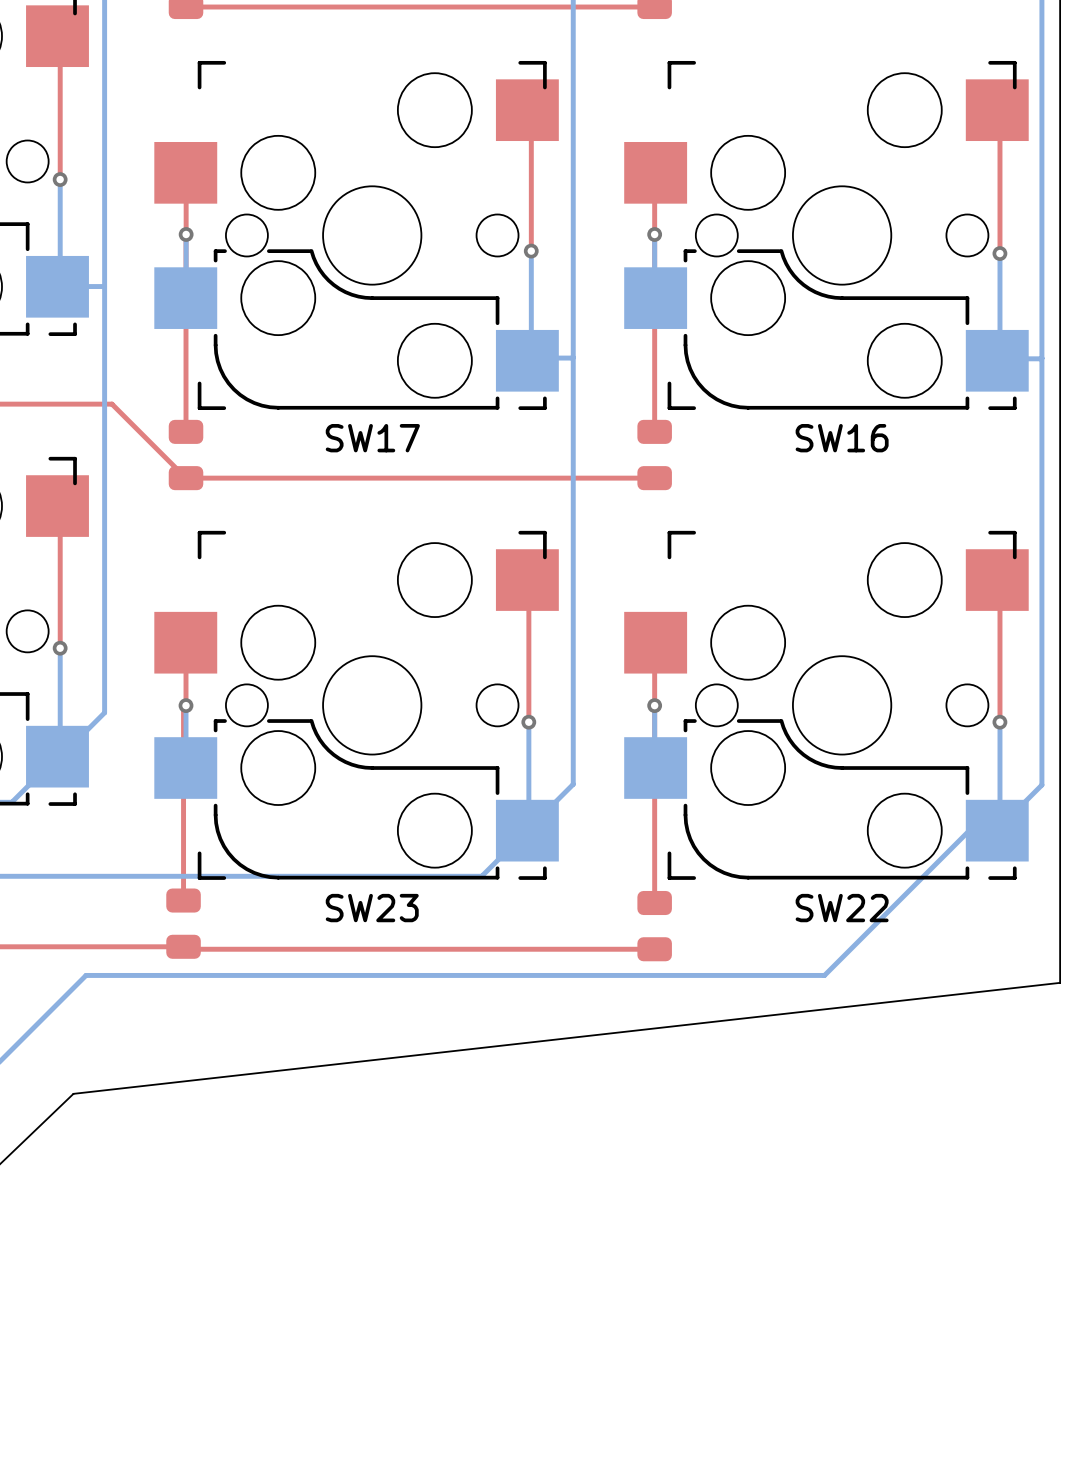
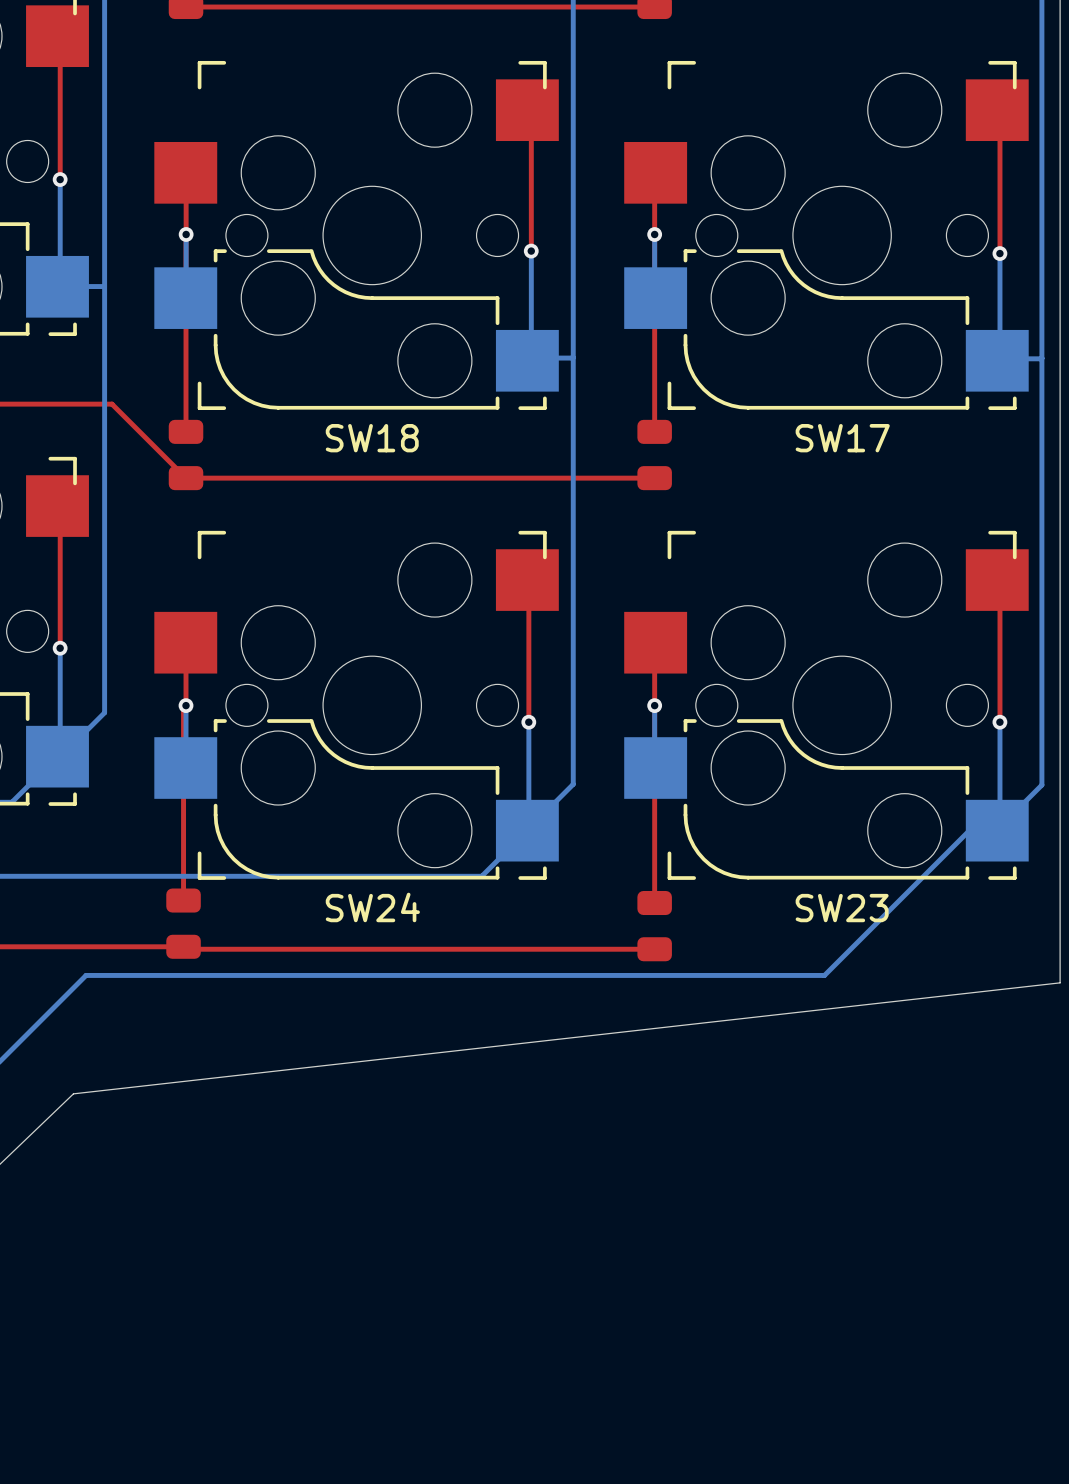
SW17 name: SW17 (372, 438) -> SW18 (372, 438)
SW16 name: SW16 (842, 438) -> SW17 (842, 438)
SW23 name: SW23 (372, 908) -> SW24 (372, 907)
SW22 name: SW22 (842, 908) -> SW23 (842, 908)

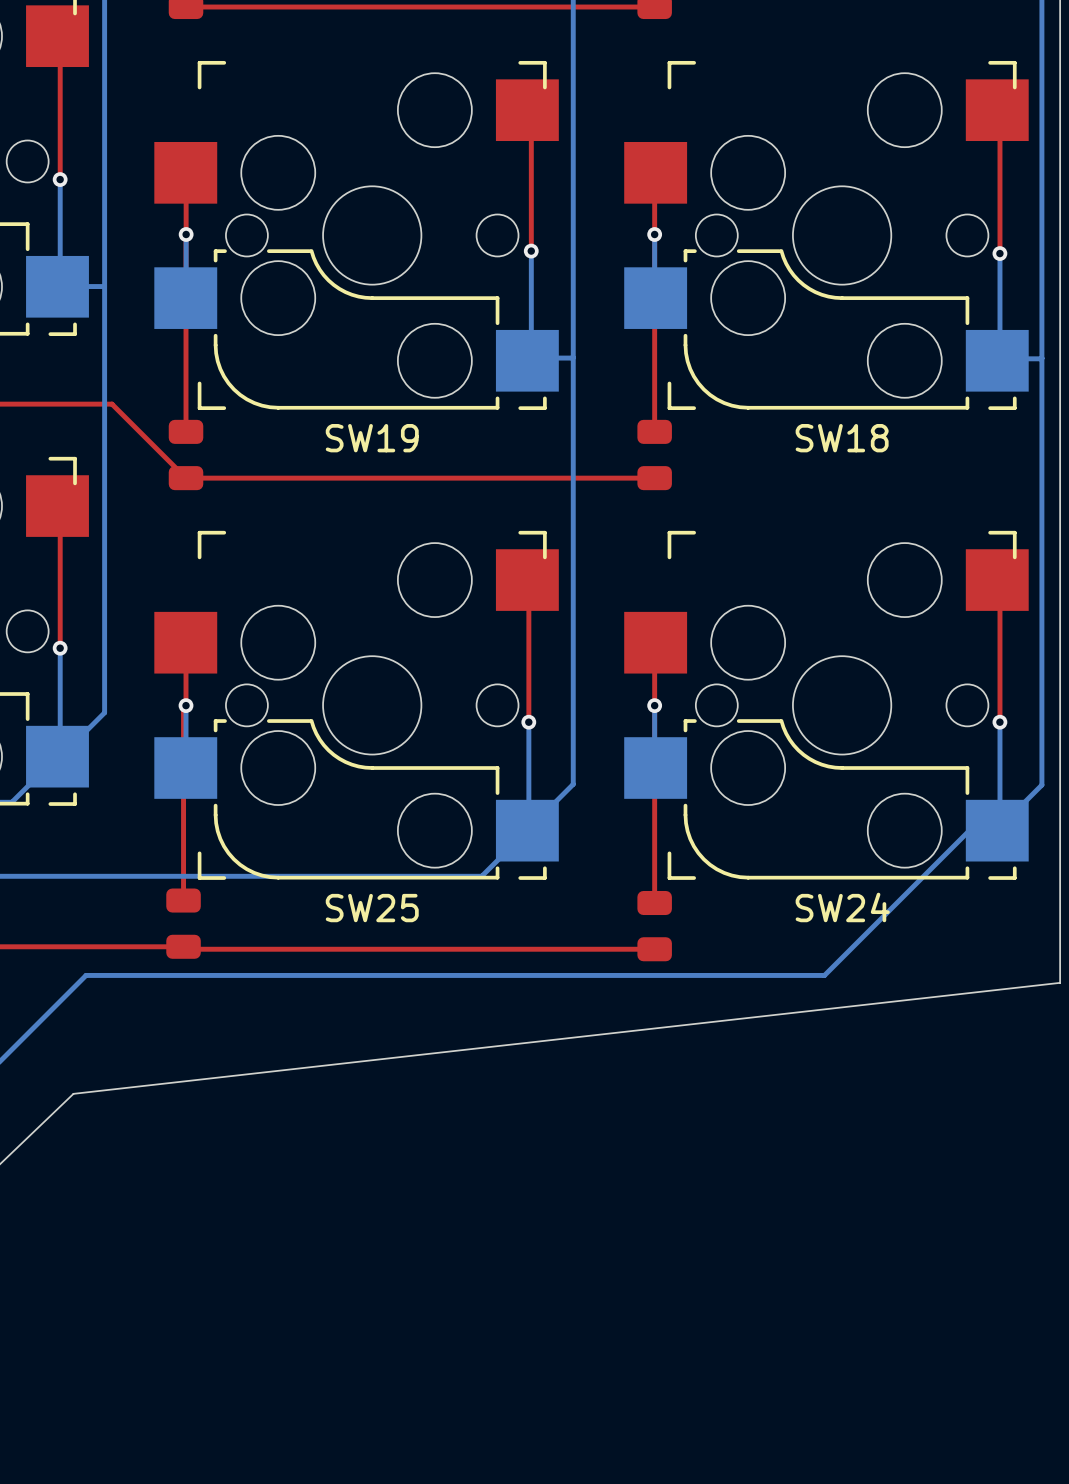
SW18 name: SW18 (372, 438) -> SW19 (372, 438)
SW17 name: SW17 (842, 438) -> SW18 (842, 438)
SW24 name: SW24 (372, 907) -> SW25 (372, 908)
SW23 name: SW23 (842, 908) -> SW24 (842, 907)

